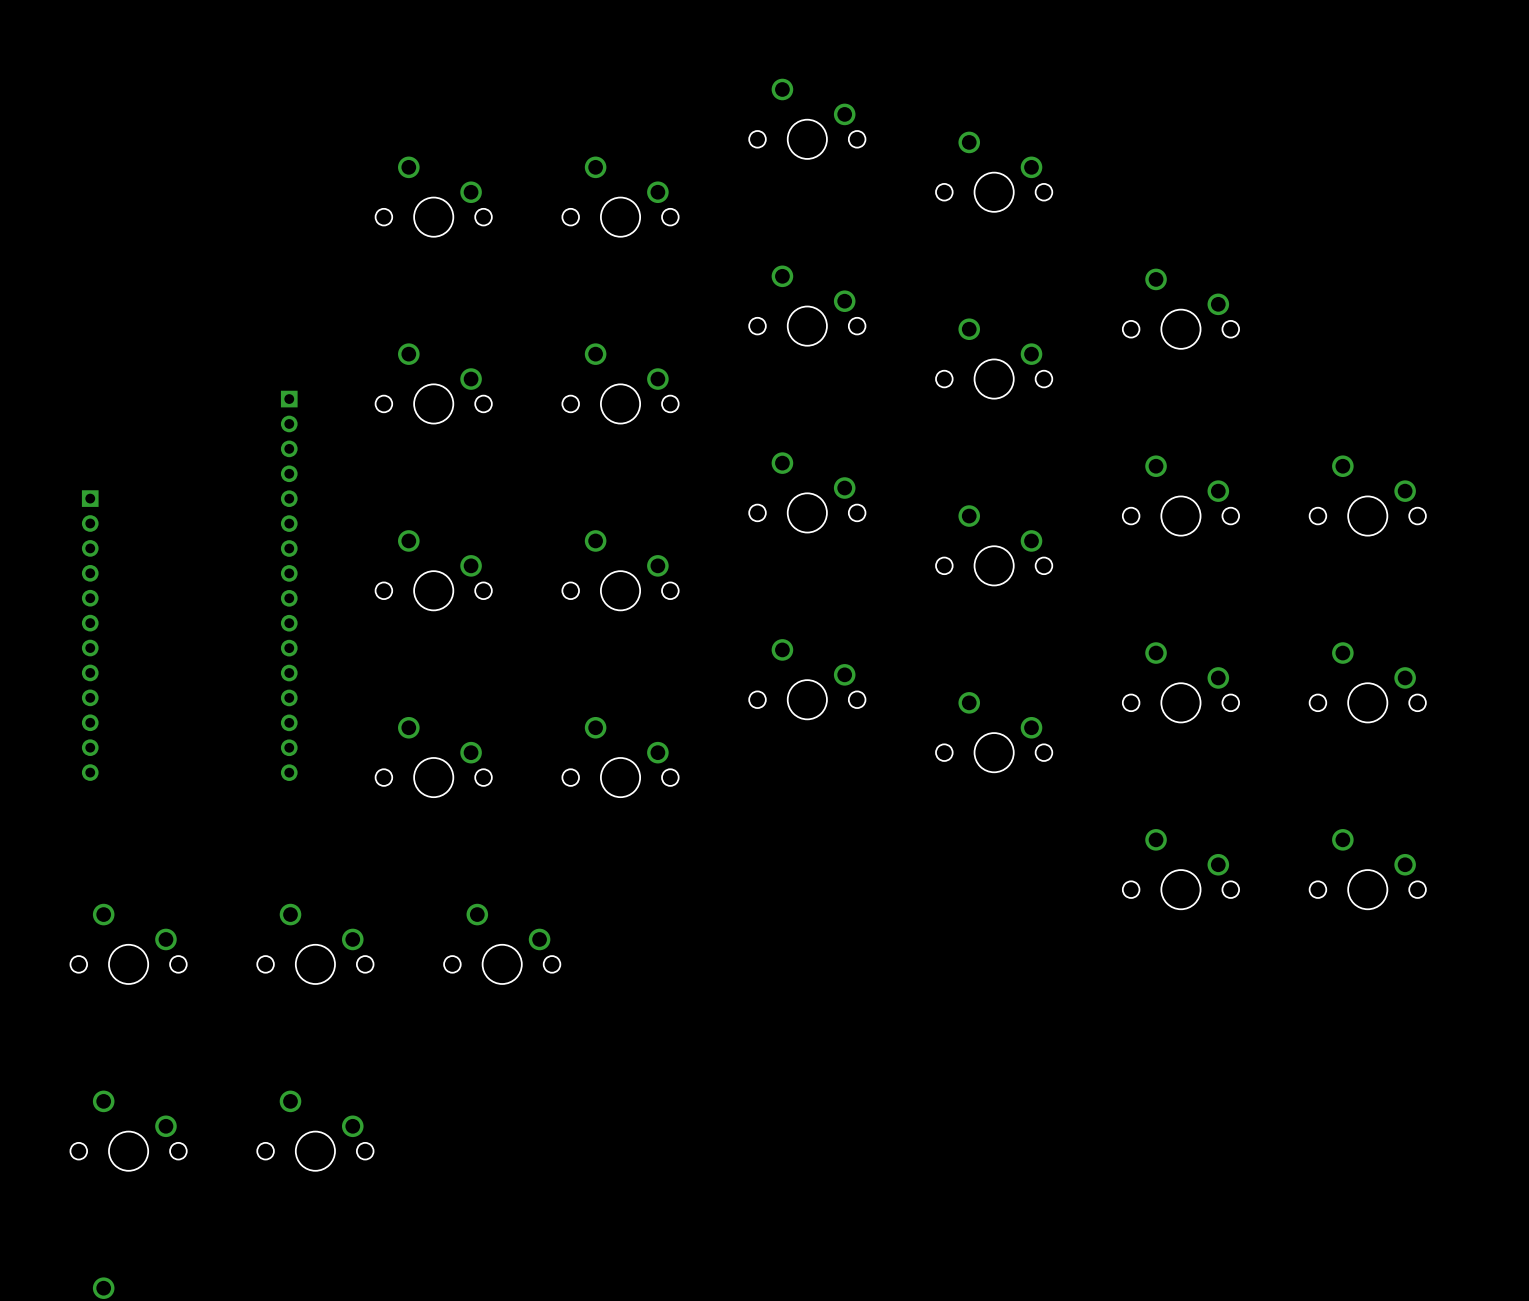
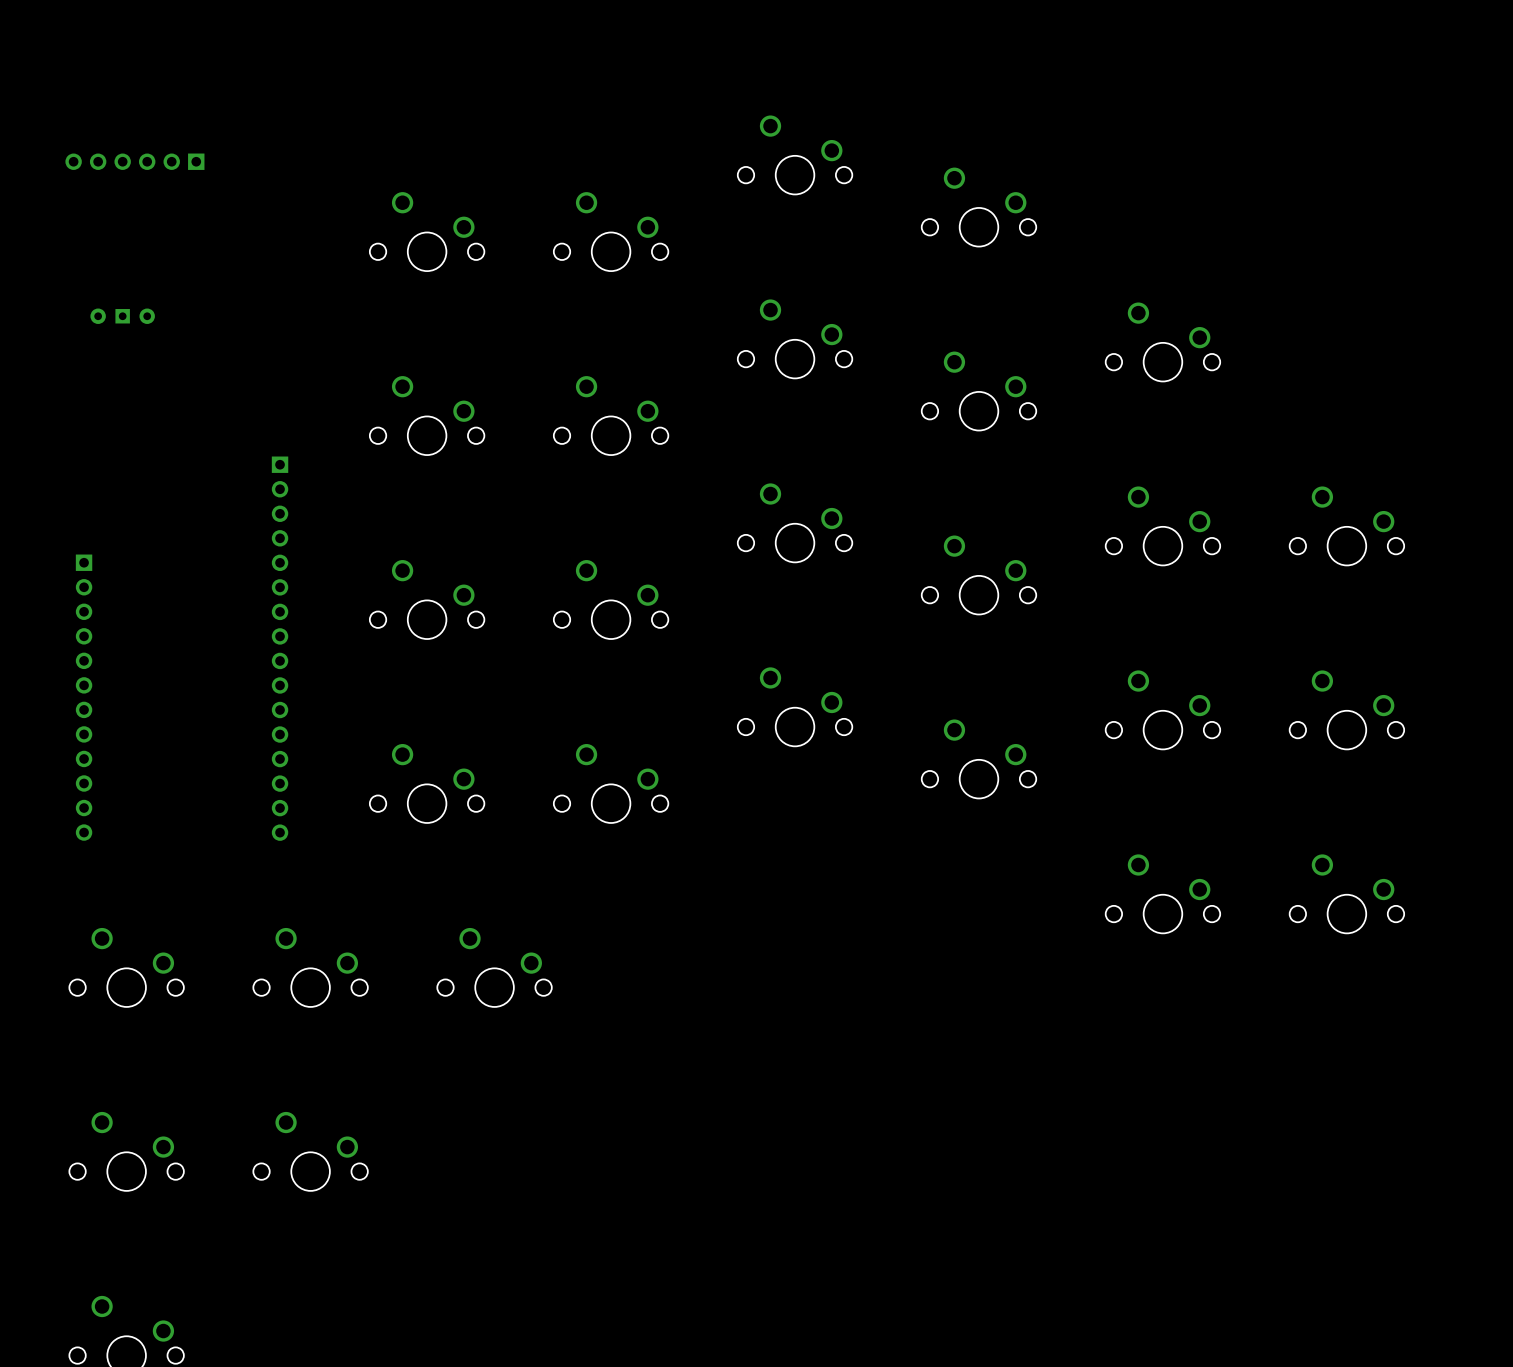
part: none -> (134, 161)
part: none -> (122, 316)
part position: (289, 585) -> (280, 648)
part position: (90, 635) -> (84, 697)

